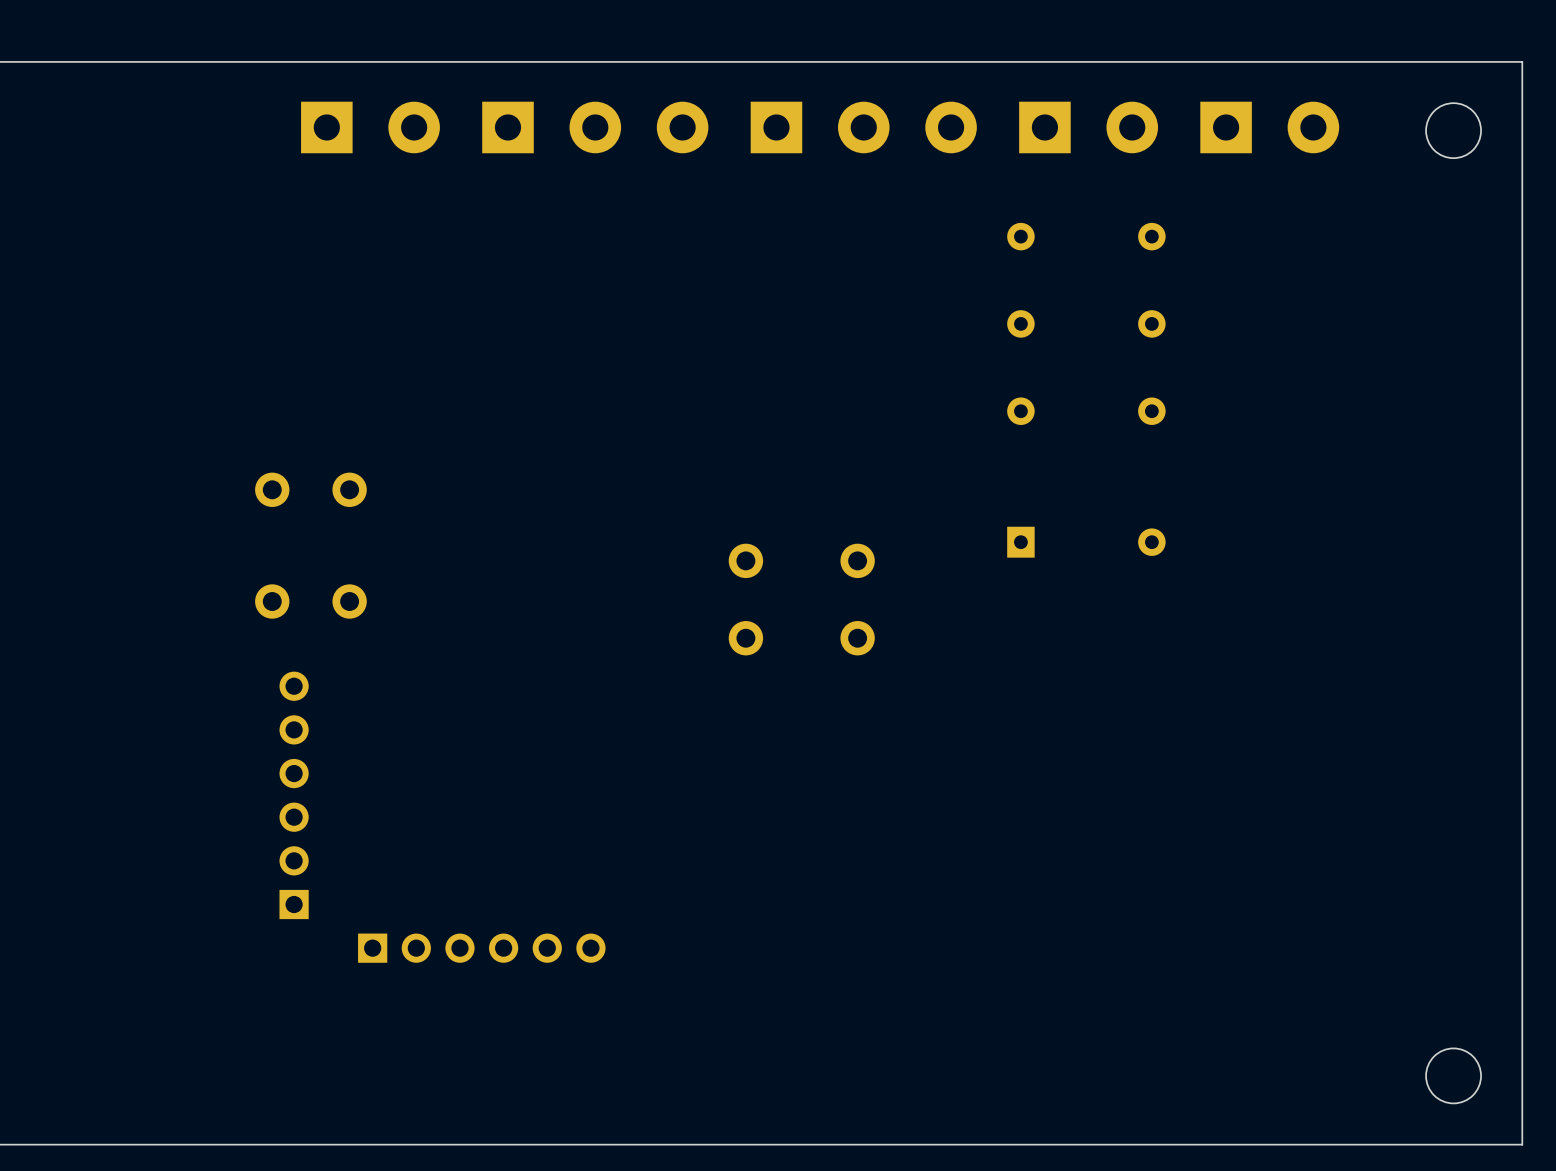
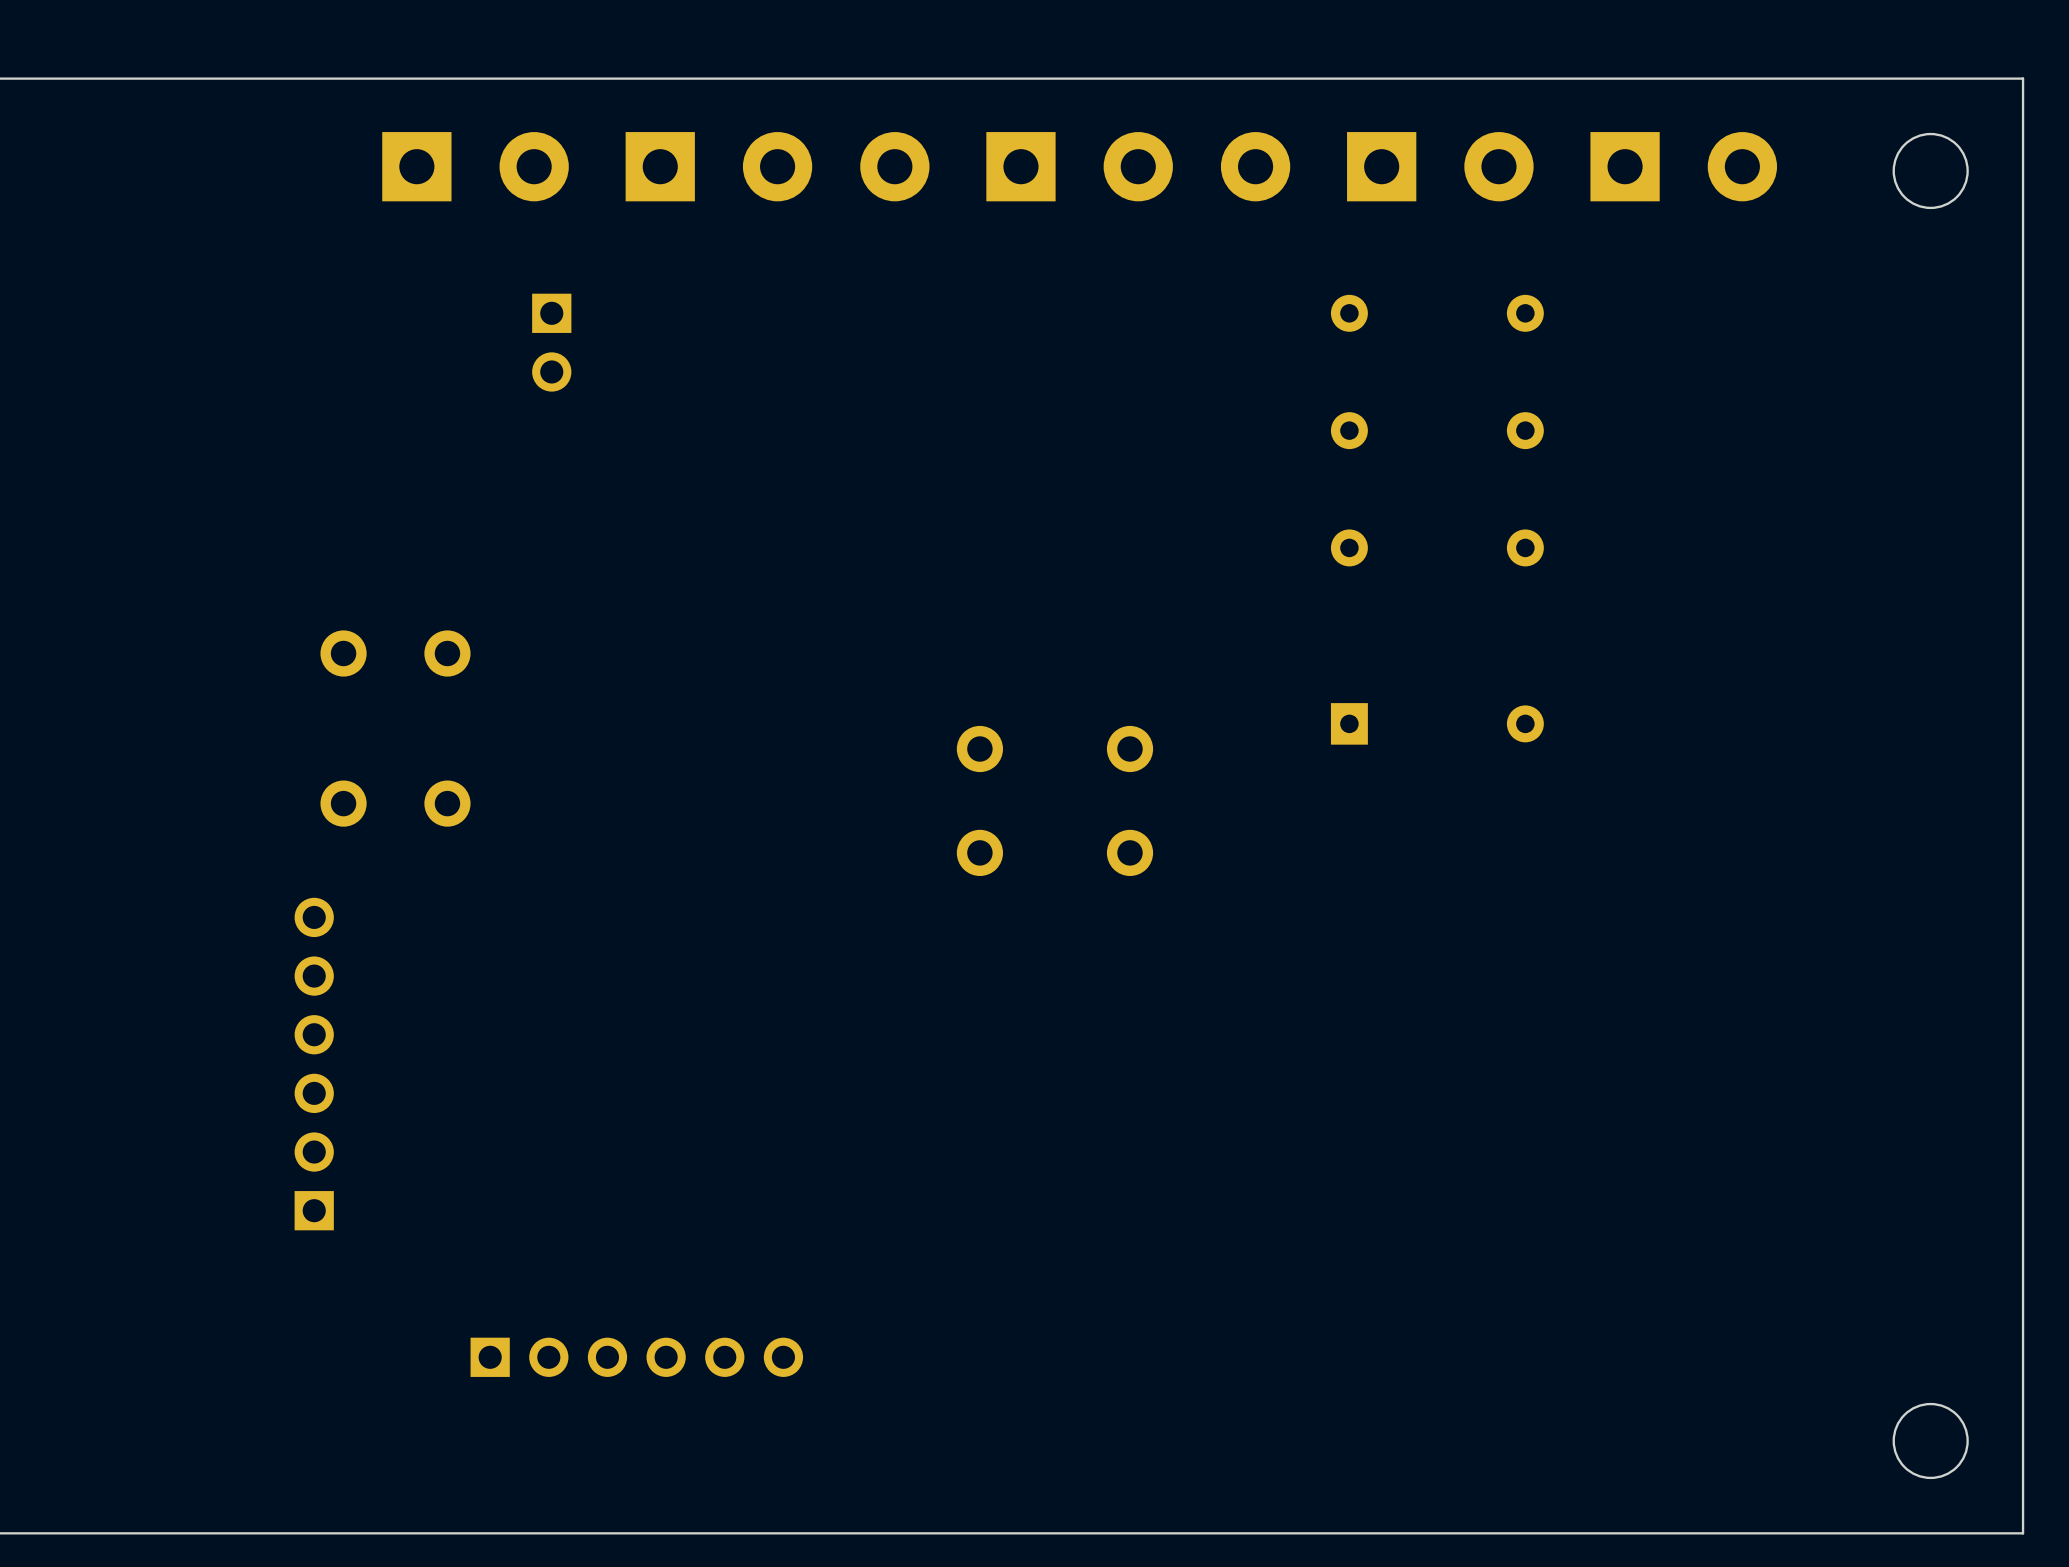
part: none -> (551, 342)
part position: (294, 795) -> (314, 1064)
part position: (481, 948) -> (636, 1357)

